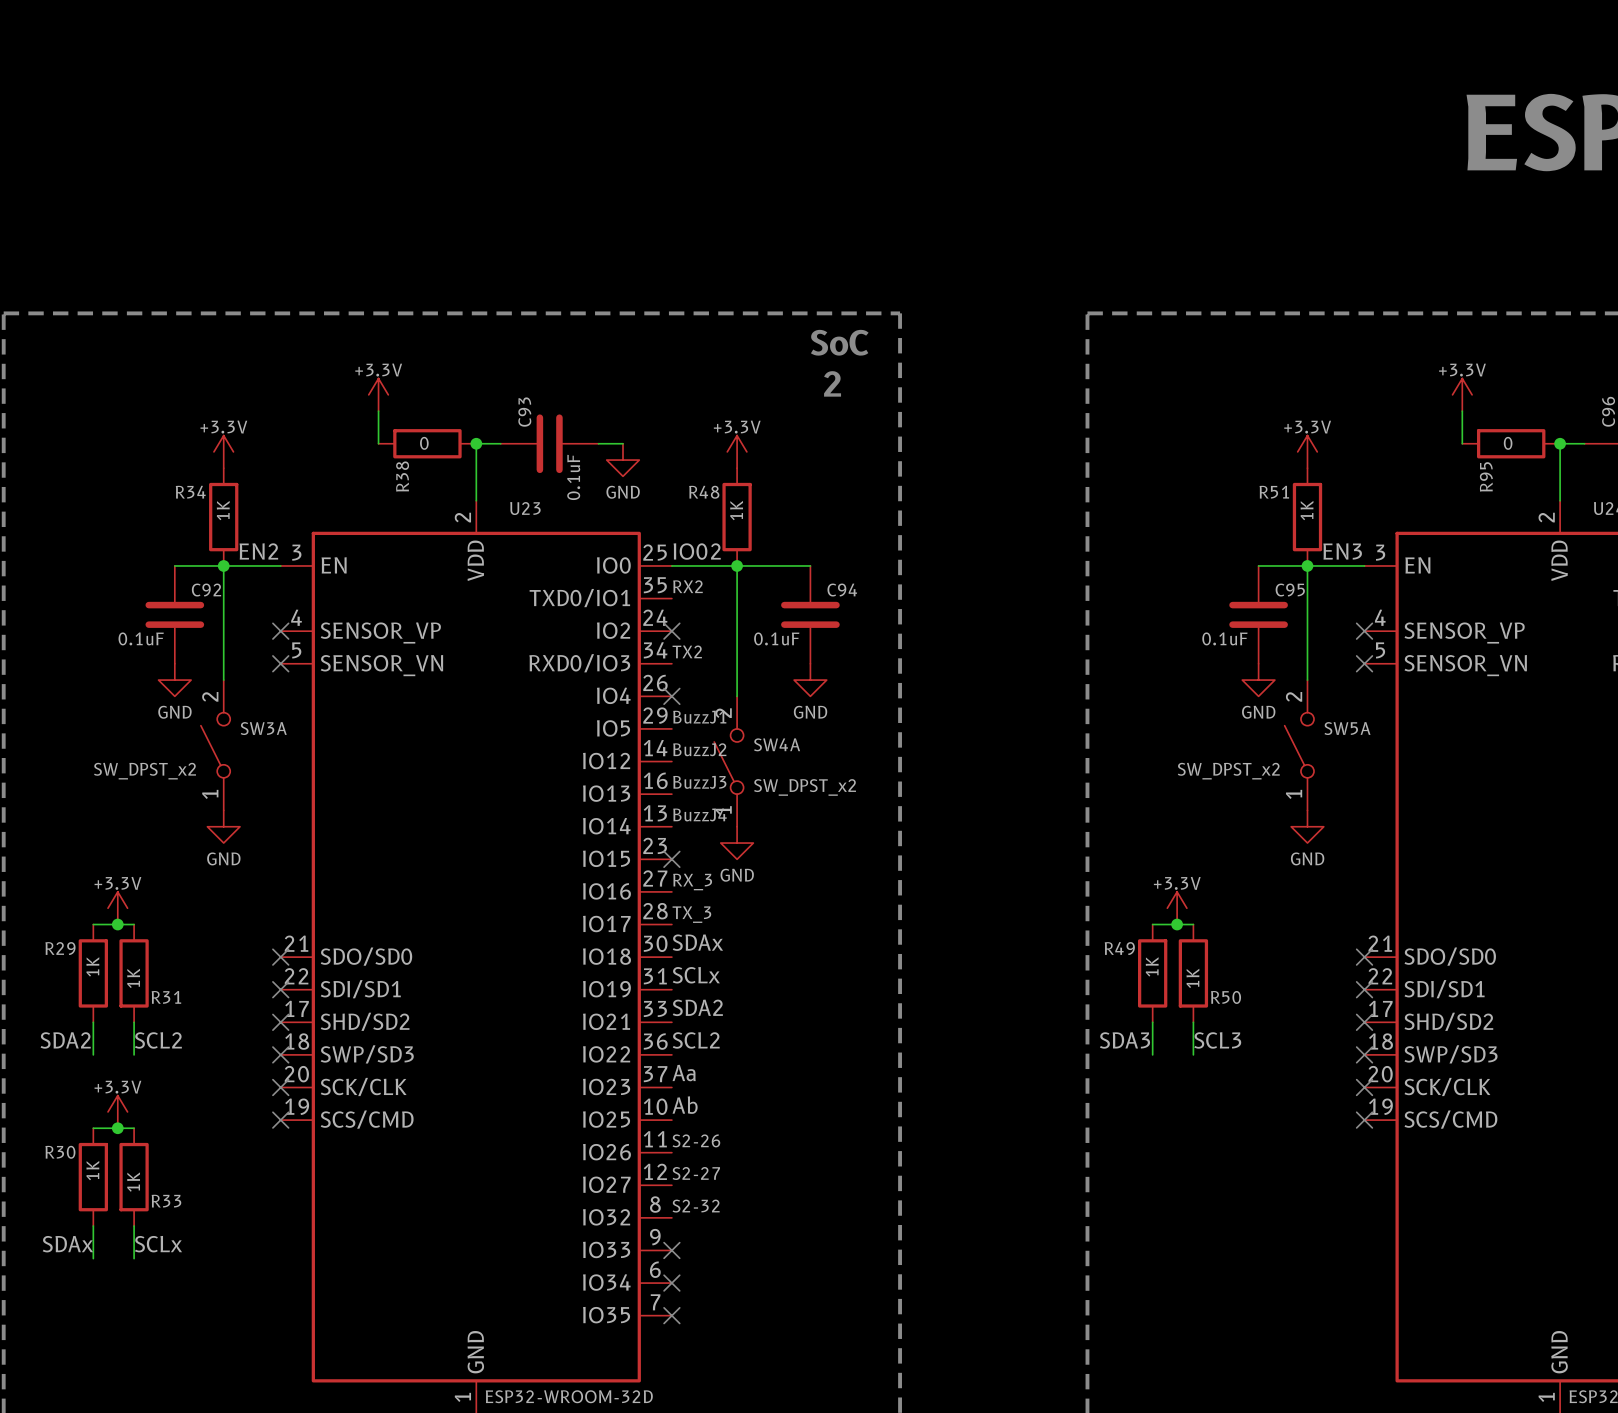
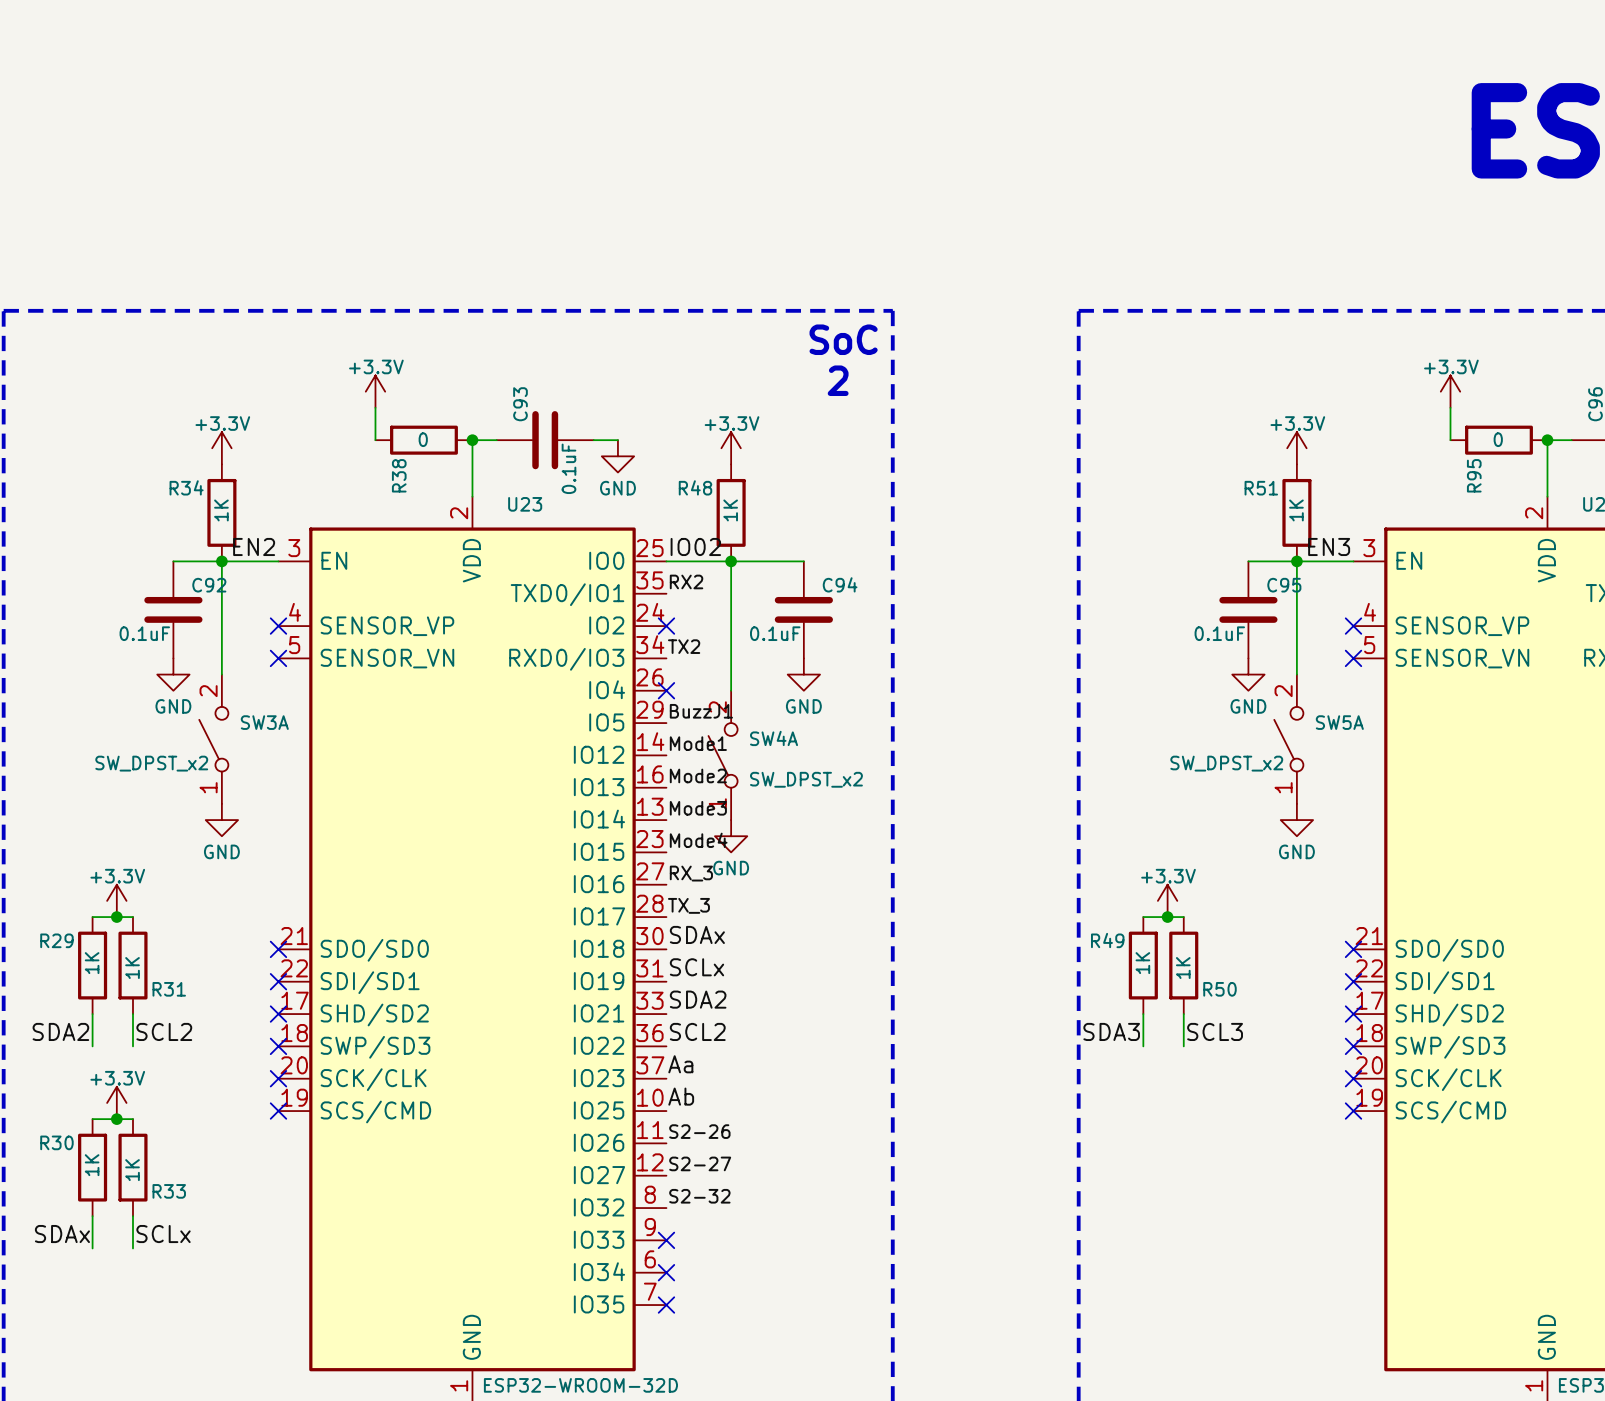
label: BuzzJ2 (699, 749) -> Mode1 (698, 743)
label: BuzzJ3 (699, 782) -> Mode2 (698, 775)
label: BuzzJ4 (700, 814) -> Mode3 (698, 808)
label: none -> Mode4 (698, 840)
no-connect mark: (671, 859) -> none

